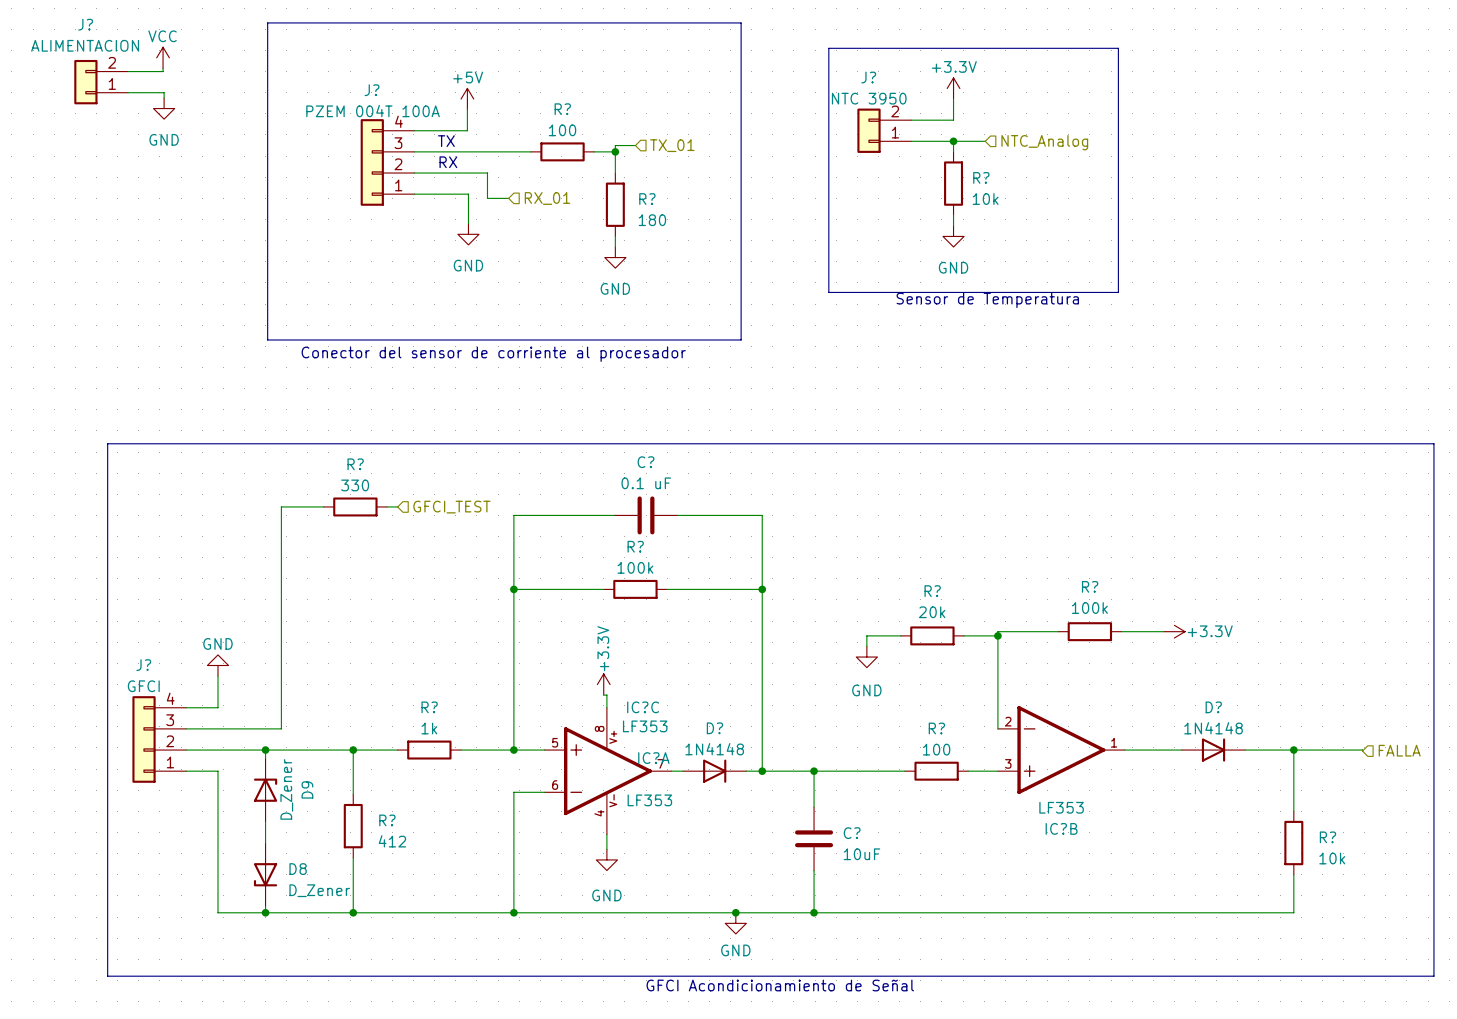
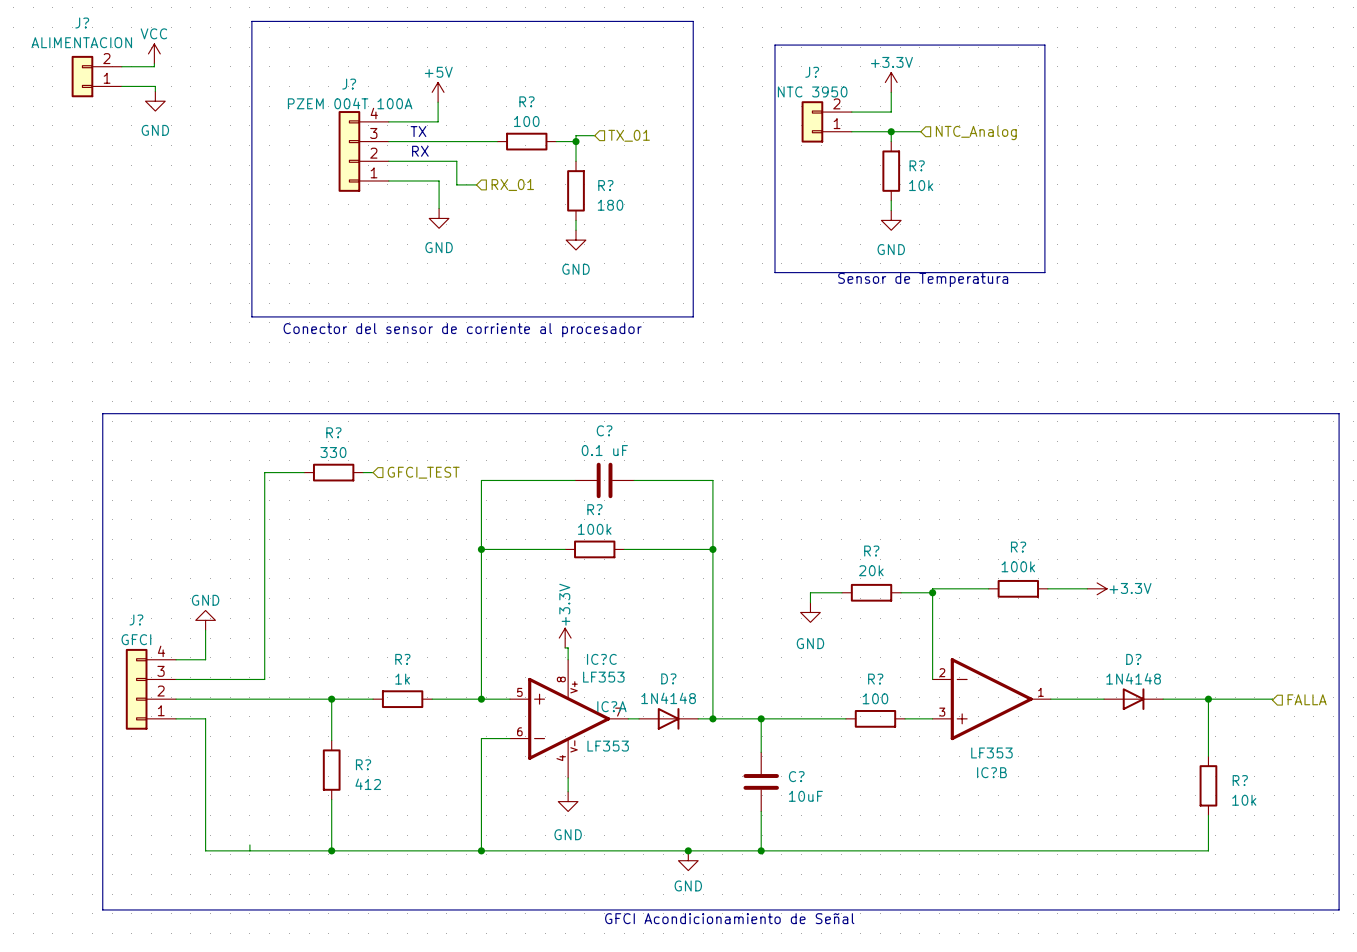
wire: (265, 750) (265, 758) -> none
junction: (265, 750) -> none
D9: D_Zener (265, 790) -> none
wire: (265, 821) (265, 843) -> none
D8: D_Zener (265, 874) -> none
junction: (265, 912) -> none

